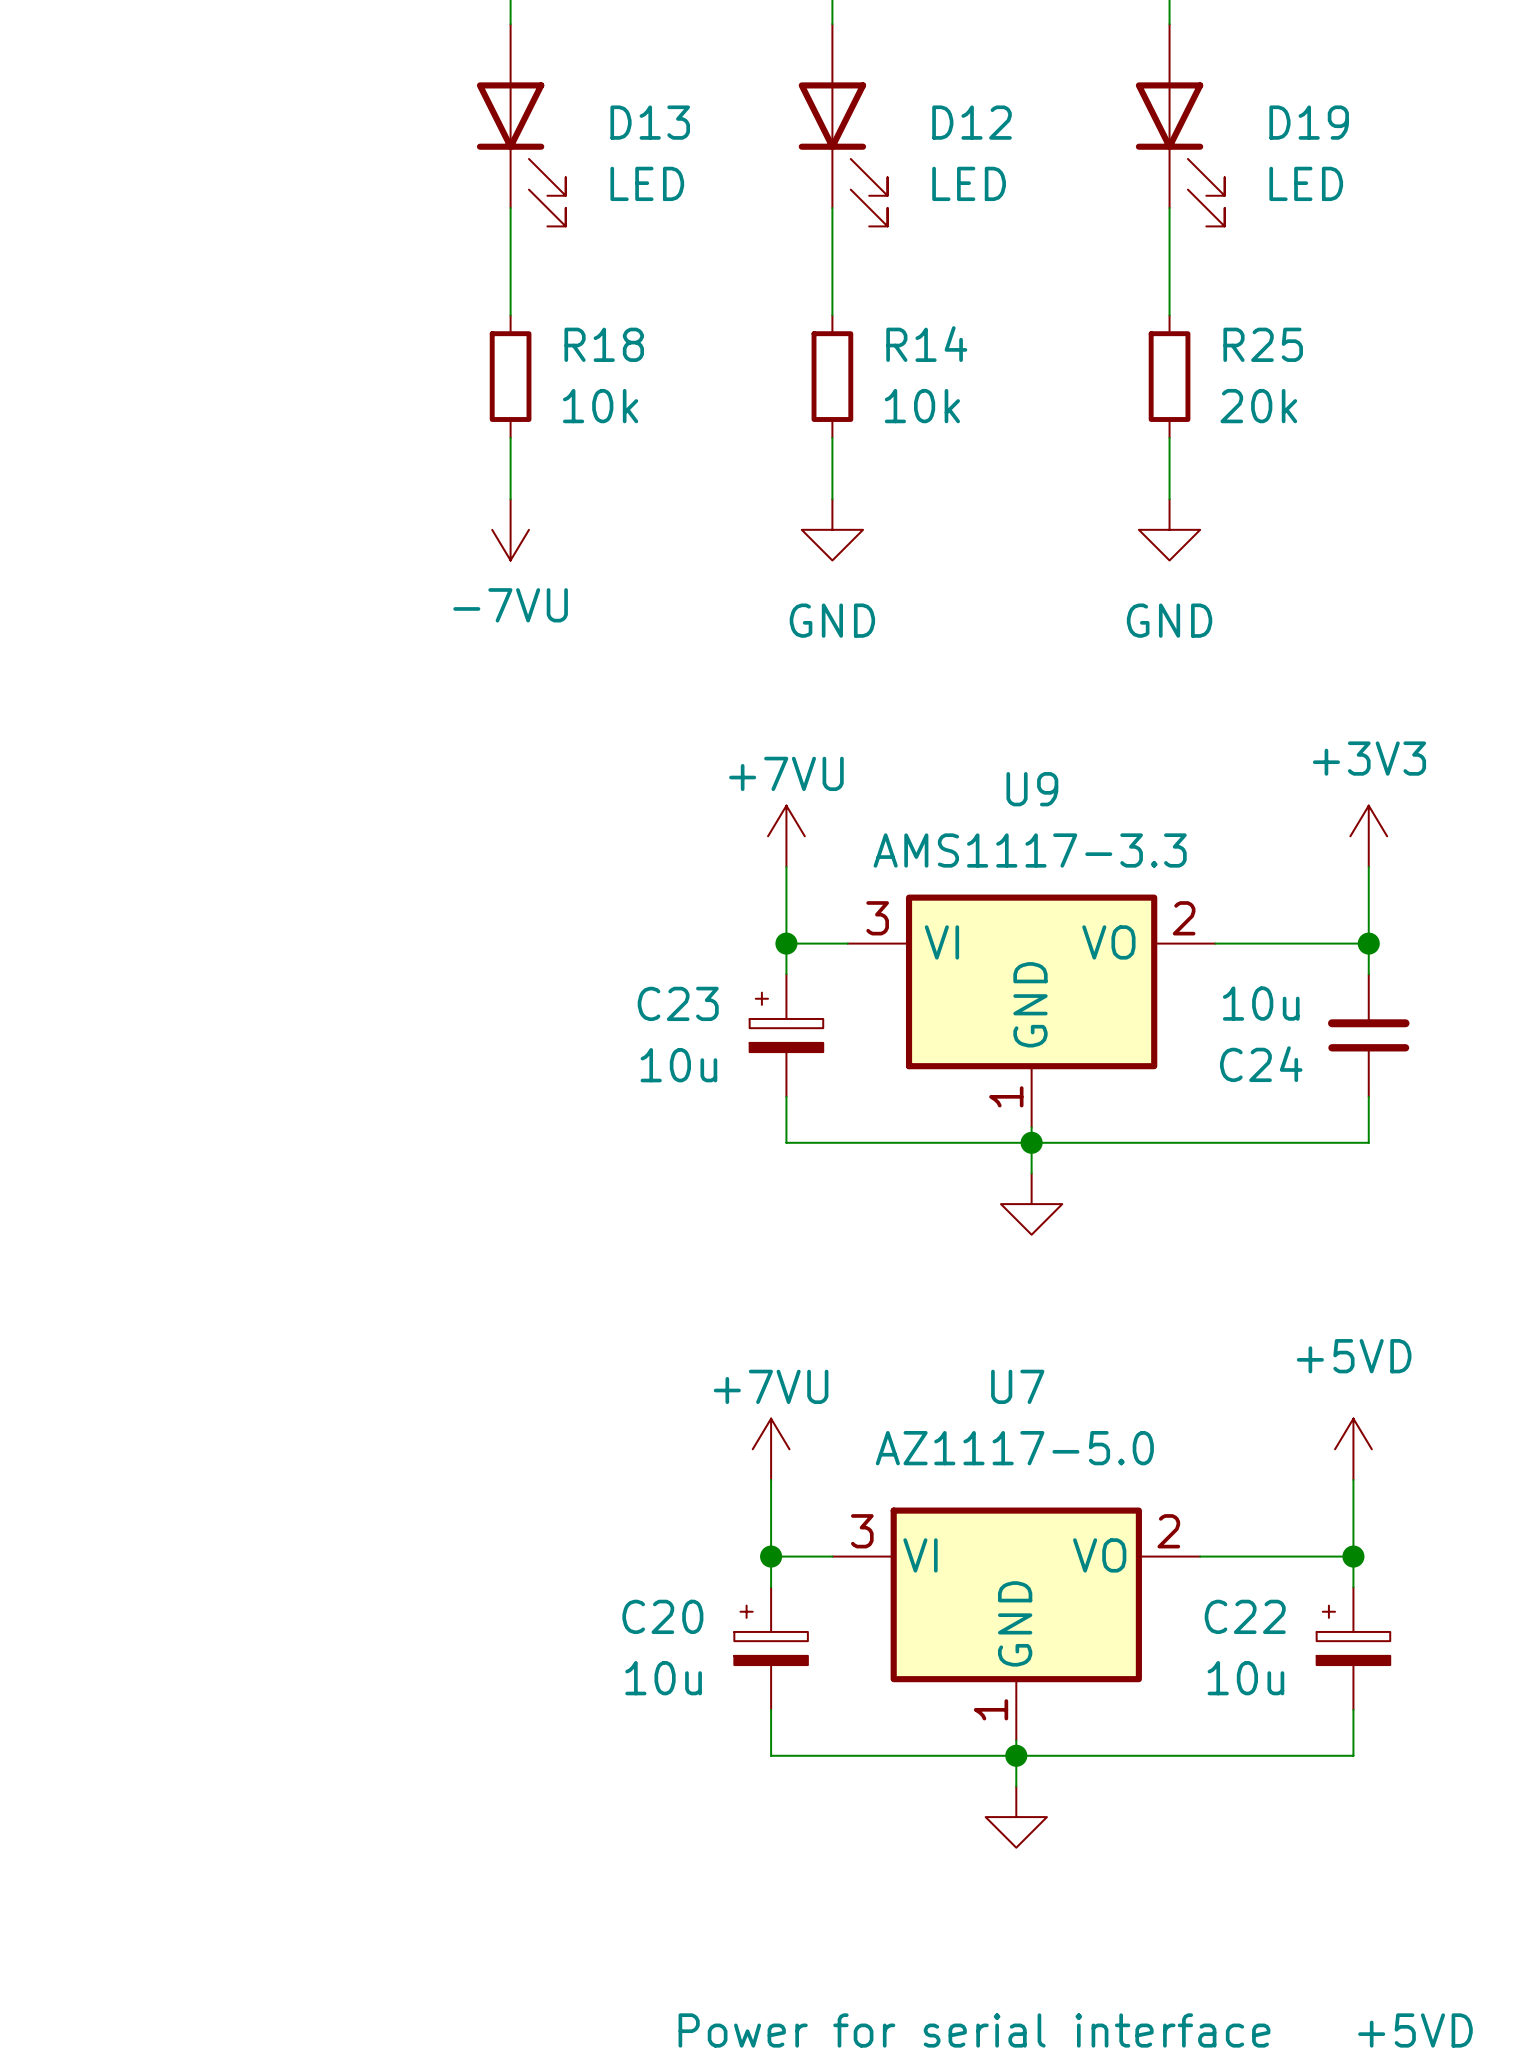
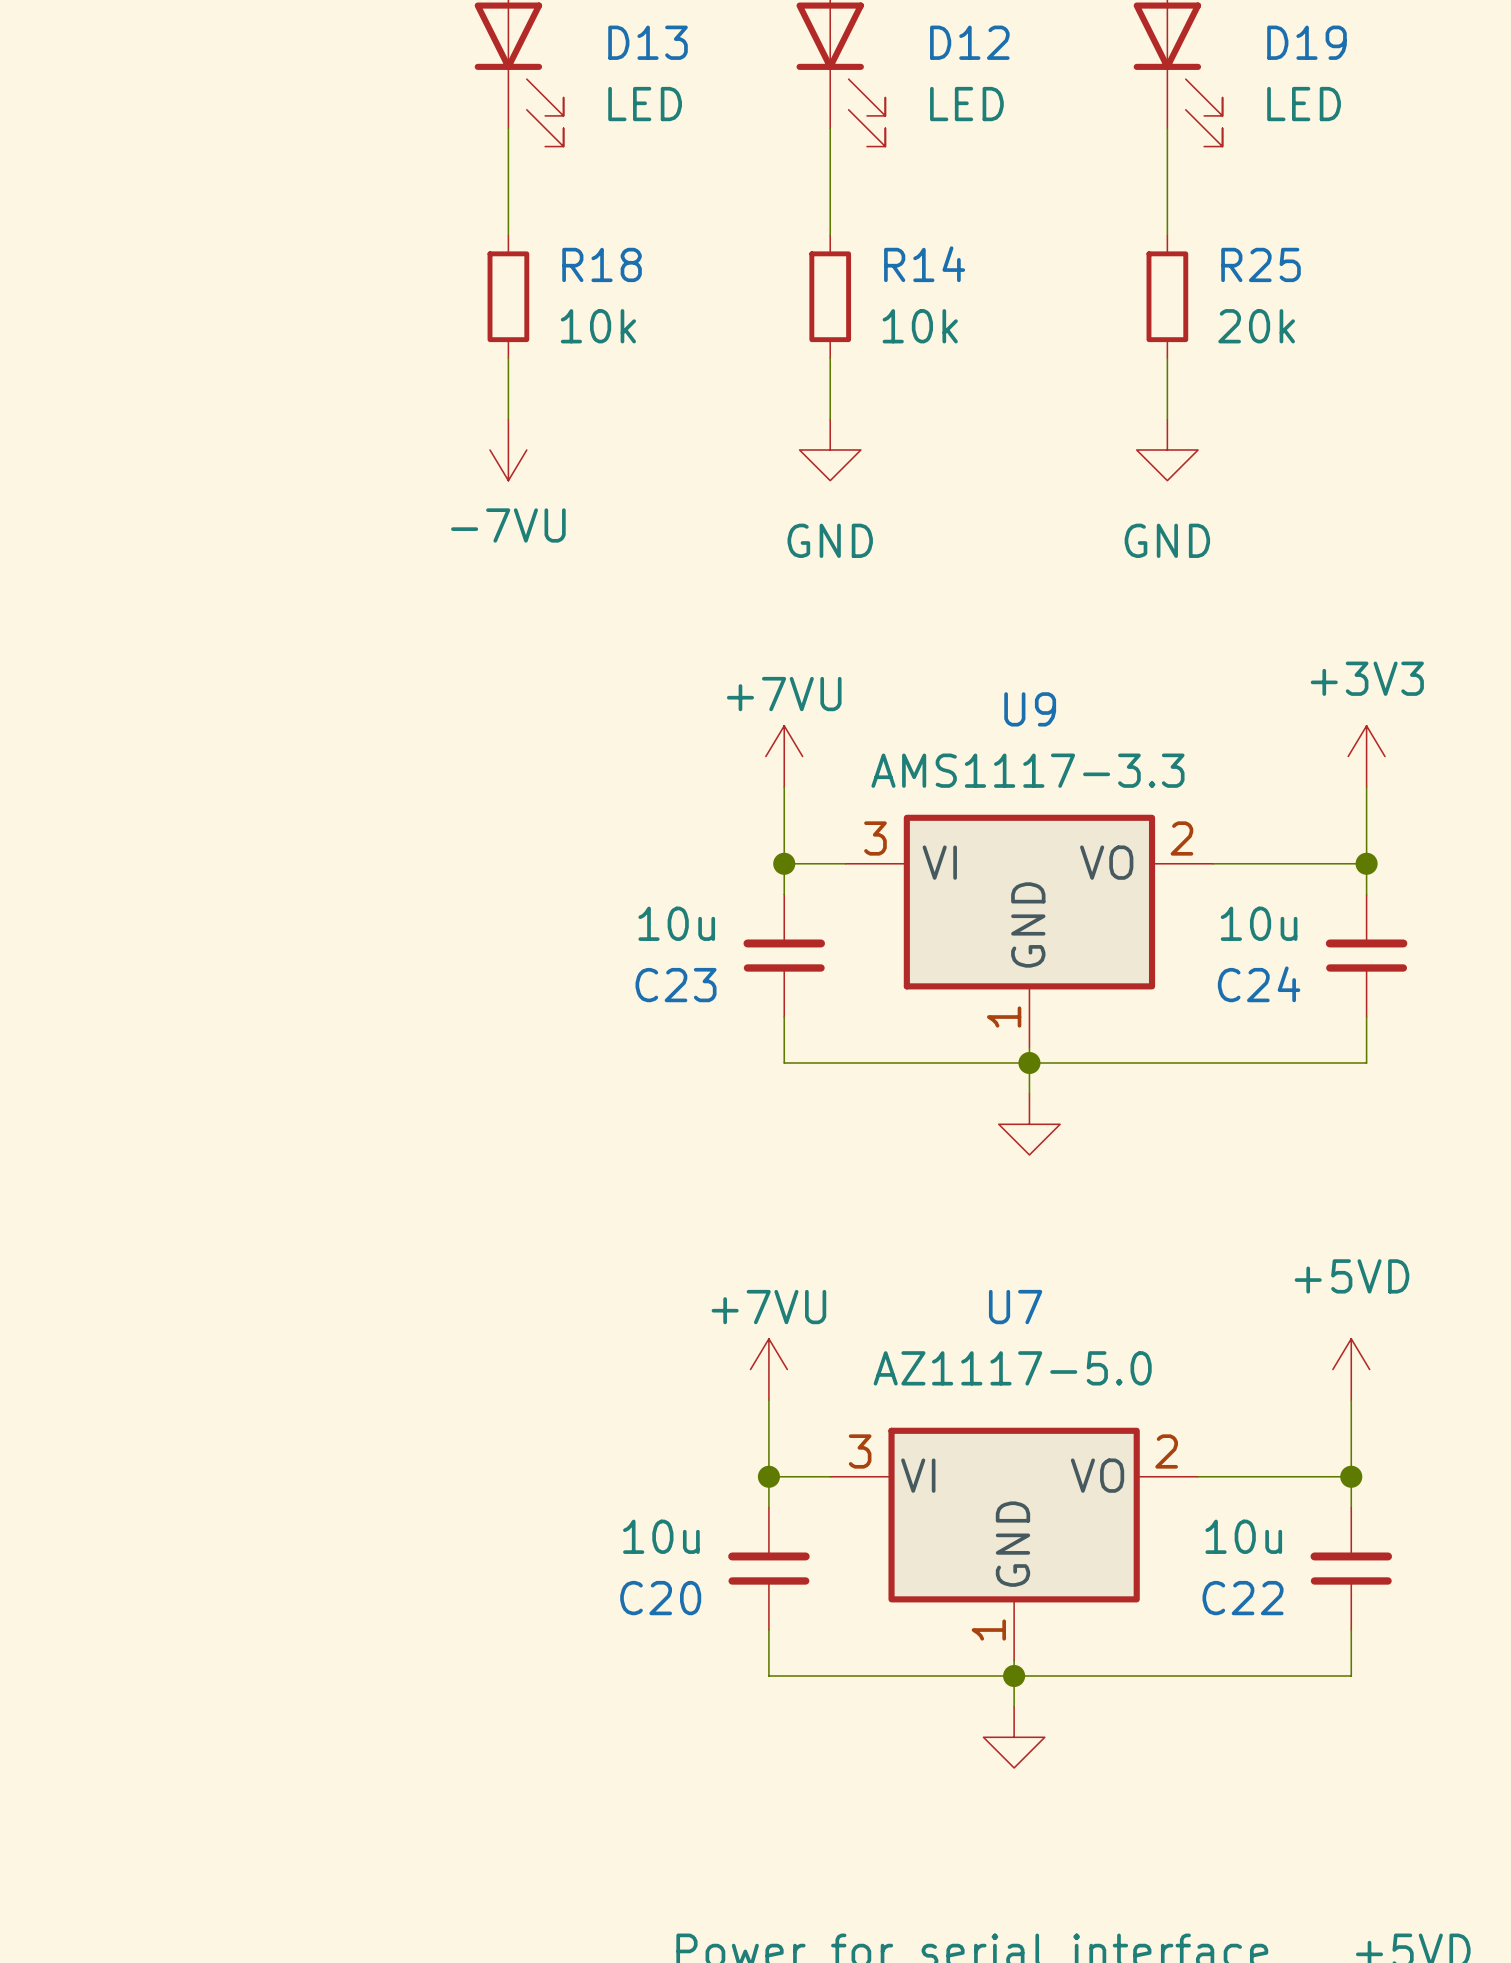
C23 symbol: [749, 974, 824, 1097] -> [743, 894, 826, 1018]
C23 name position: C23 (678, 1003) -> C23 (676, 985)
C23 value position: 10u (678, 1065) -> 10u (676, 923)
C20 symbol: [734, 1587, 808, 1710] -> [728, 1507, 810, 1631]
C22 symbol: [1316, 1587, 1391, 1710] -> [1310, 1507, 1393, 1631]
C20 name position: C20 (662, 1616) -> C20 (660, 1598)
C22 name position: C22 (1245, 1616) -> C22 (1243, 1598)
C20 value position: 10u (663, 1678) -> 10u (661, 1536)
C22 value position: 10u (1245, 1678) -> 10u (1243, 1536)

